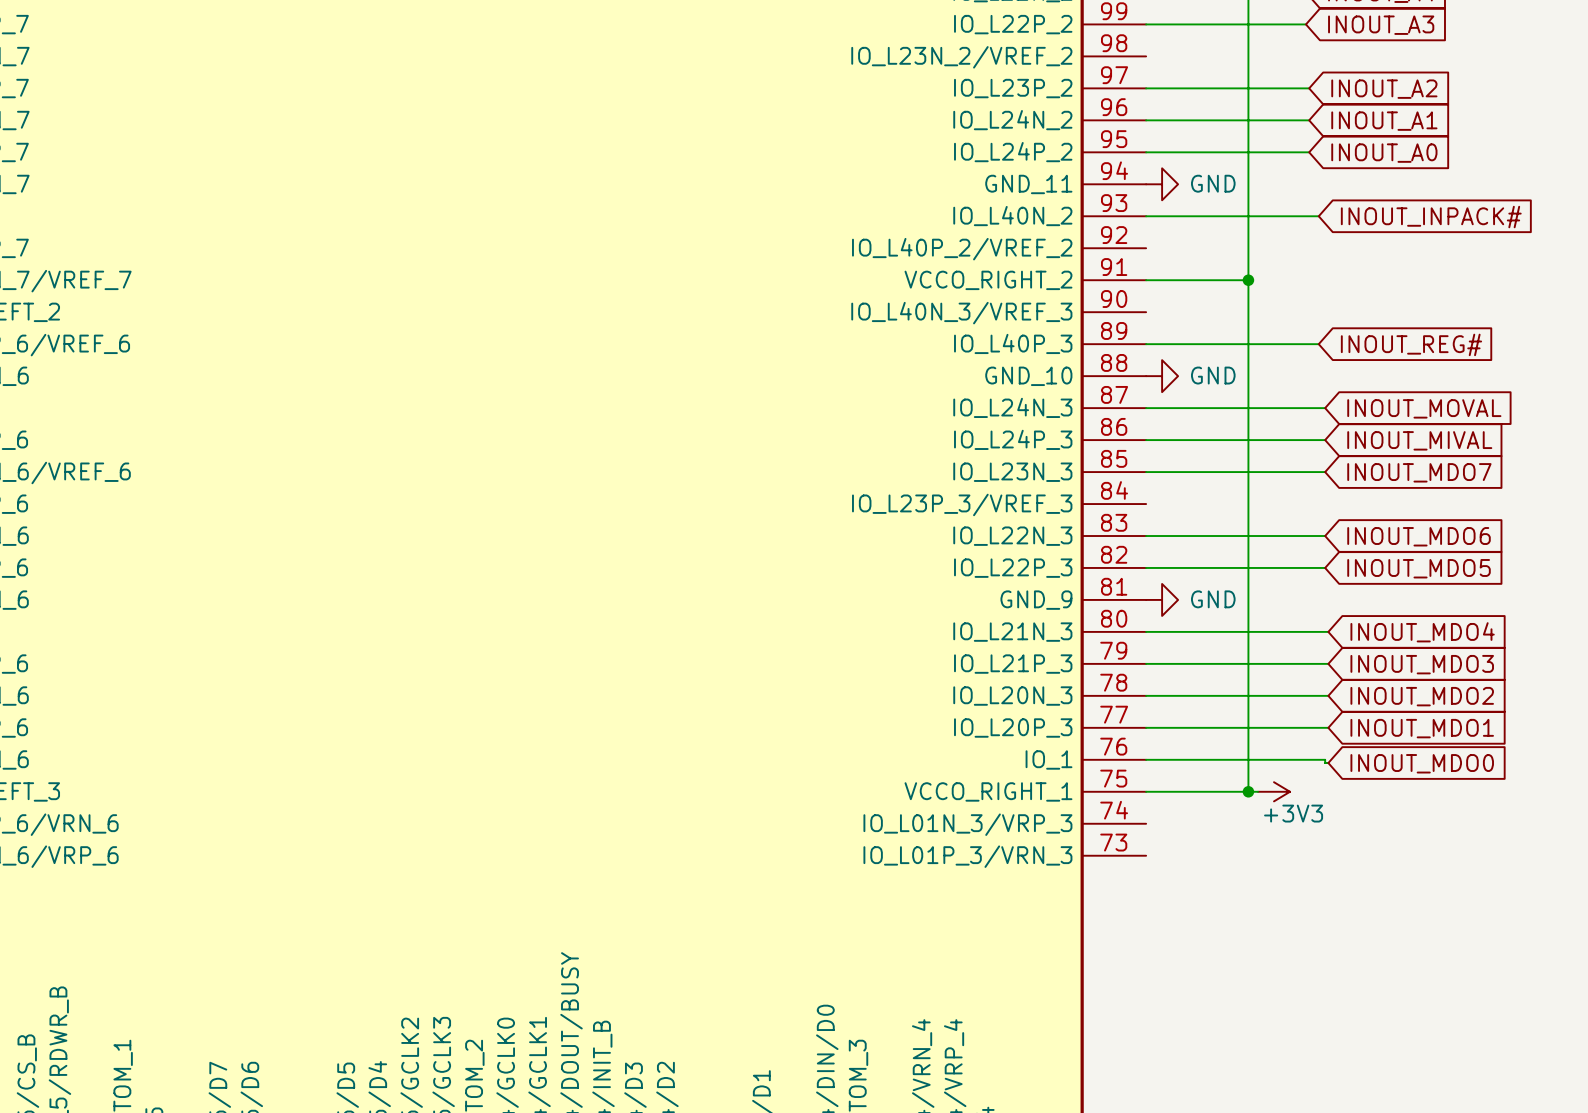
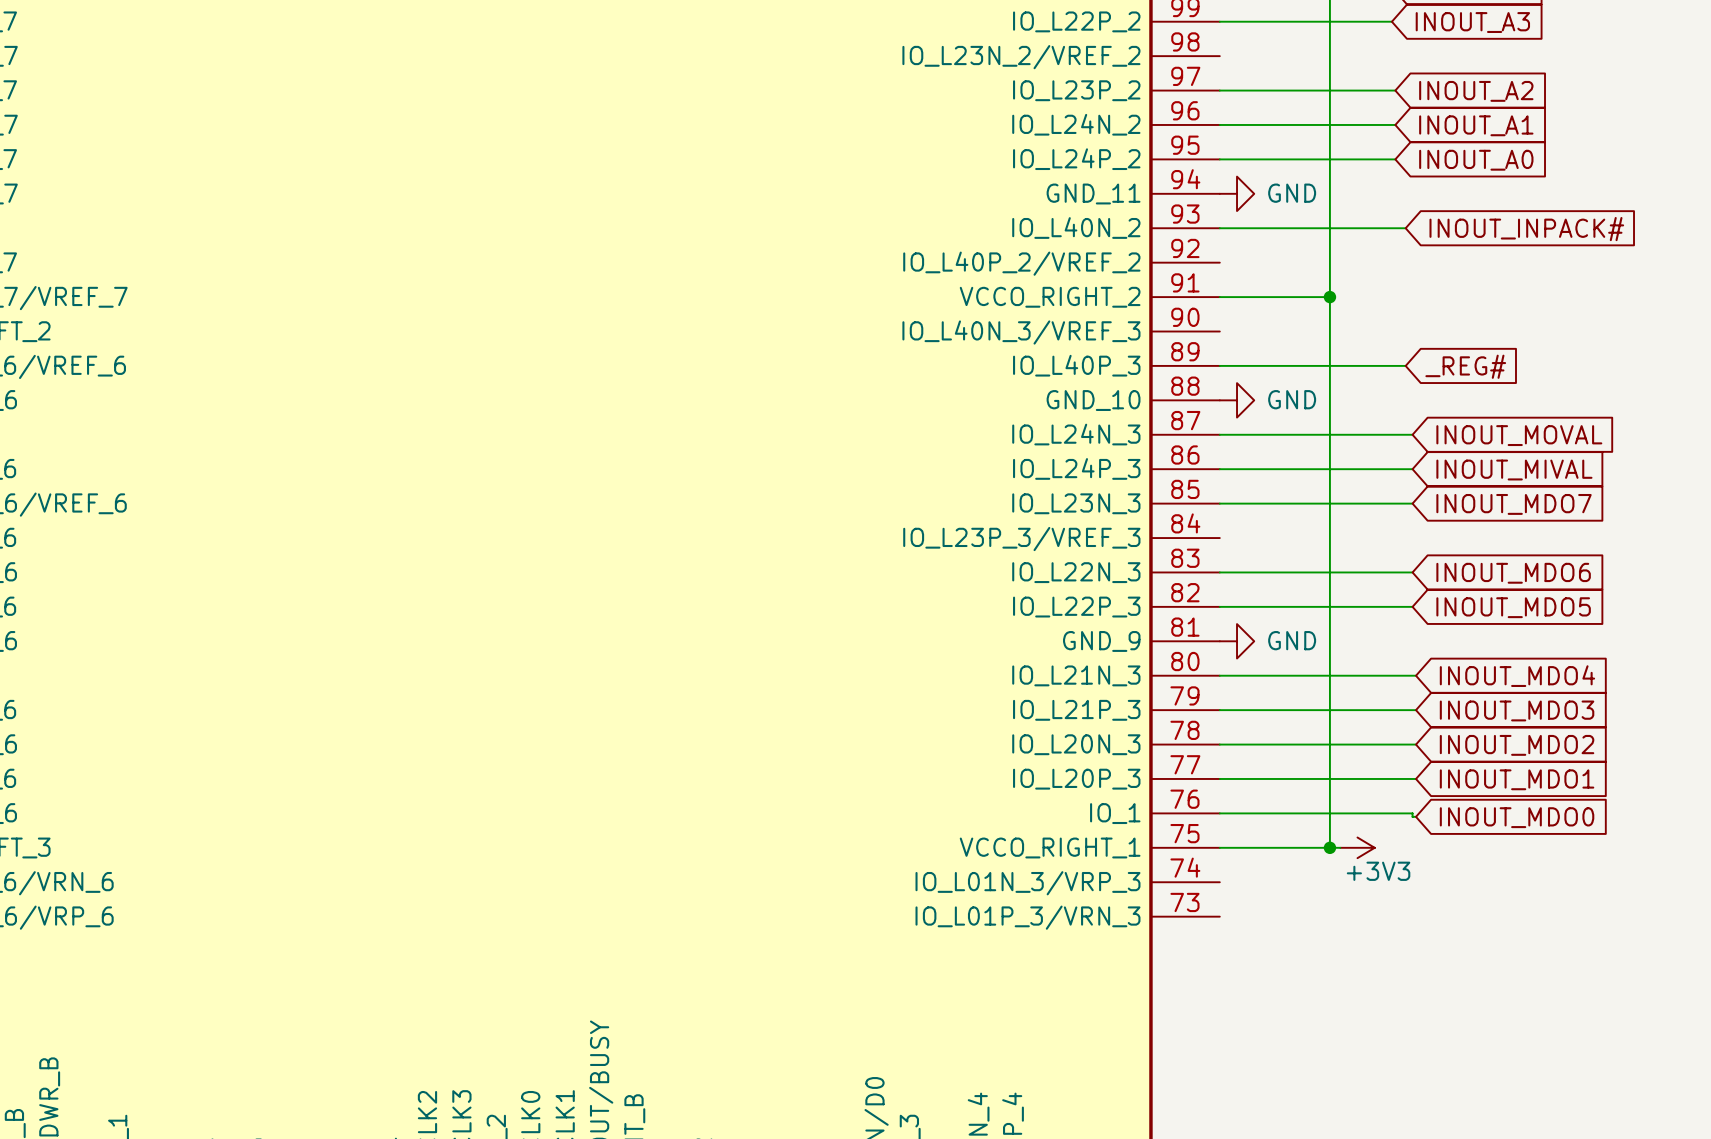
global label: INOUT_REG# (1411, 344) -> _REG# (1465, 366)

